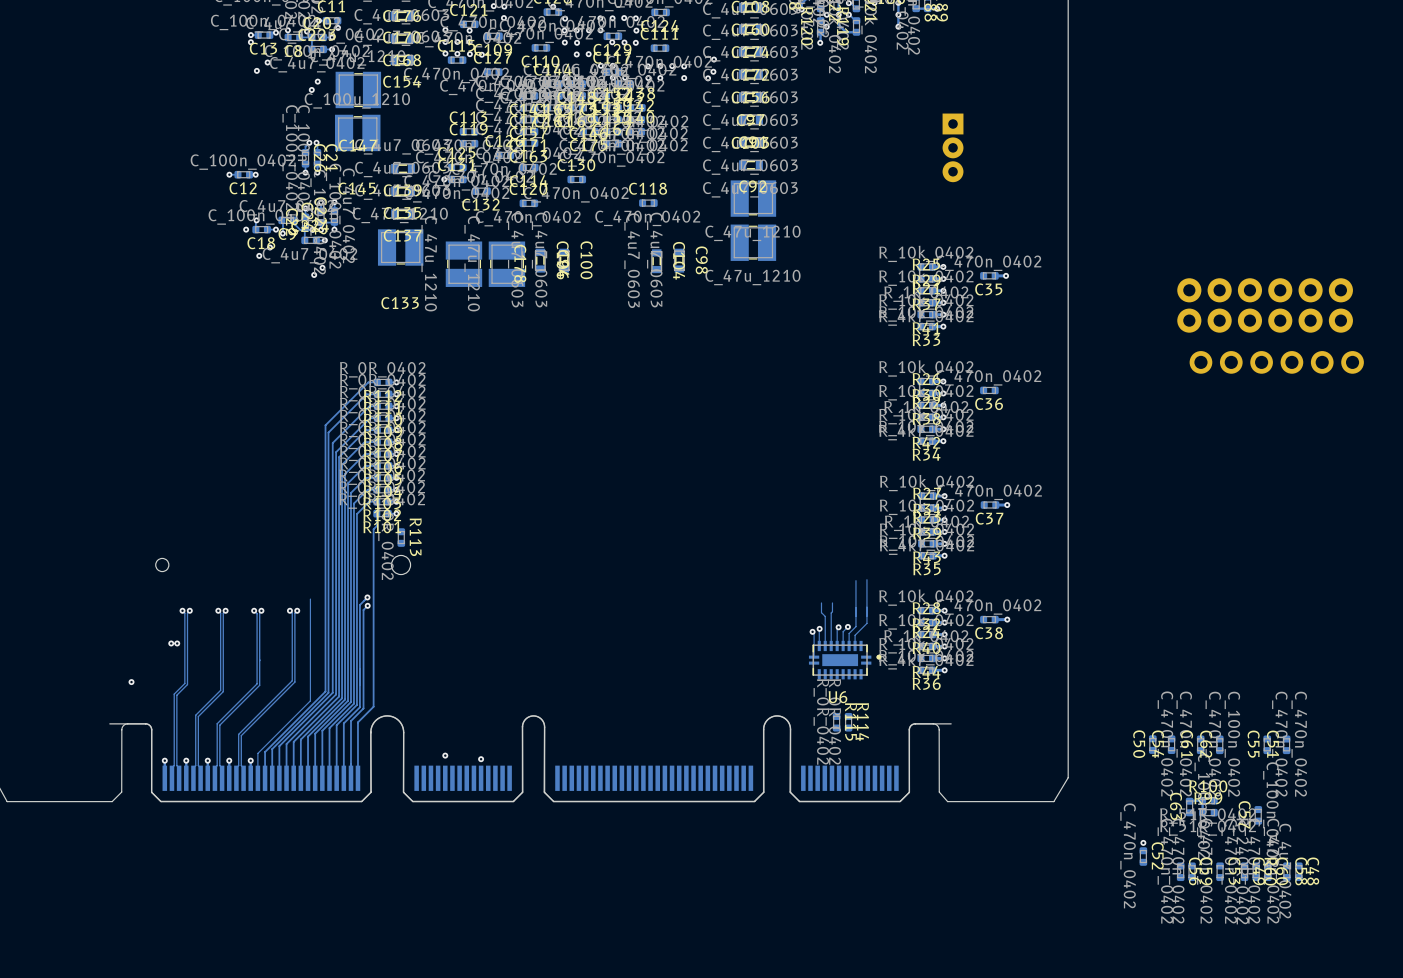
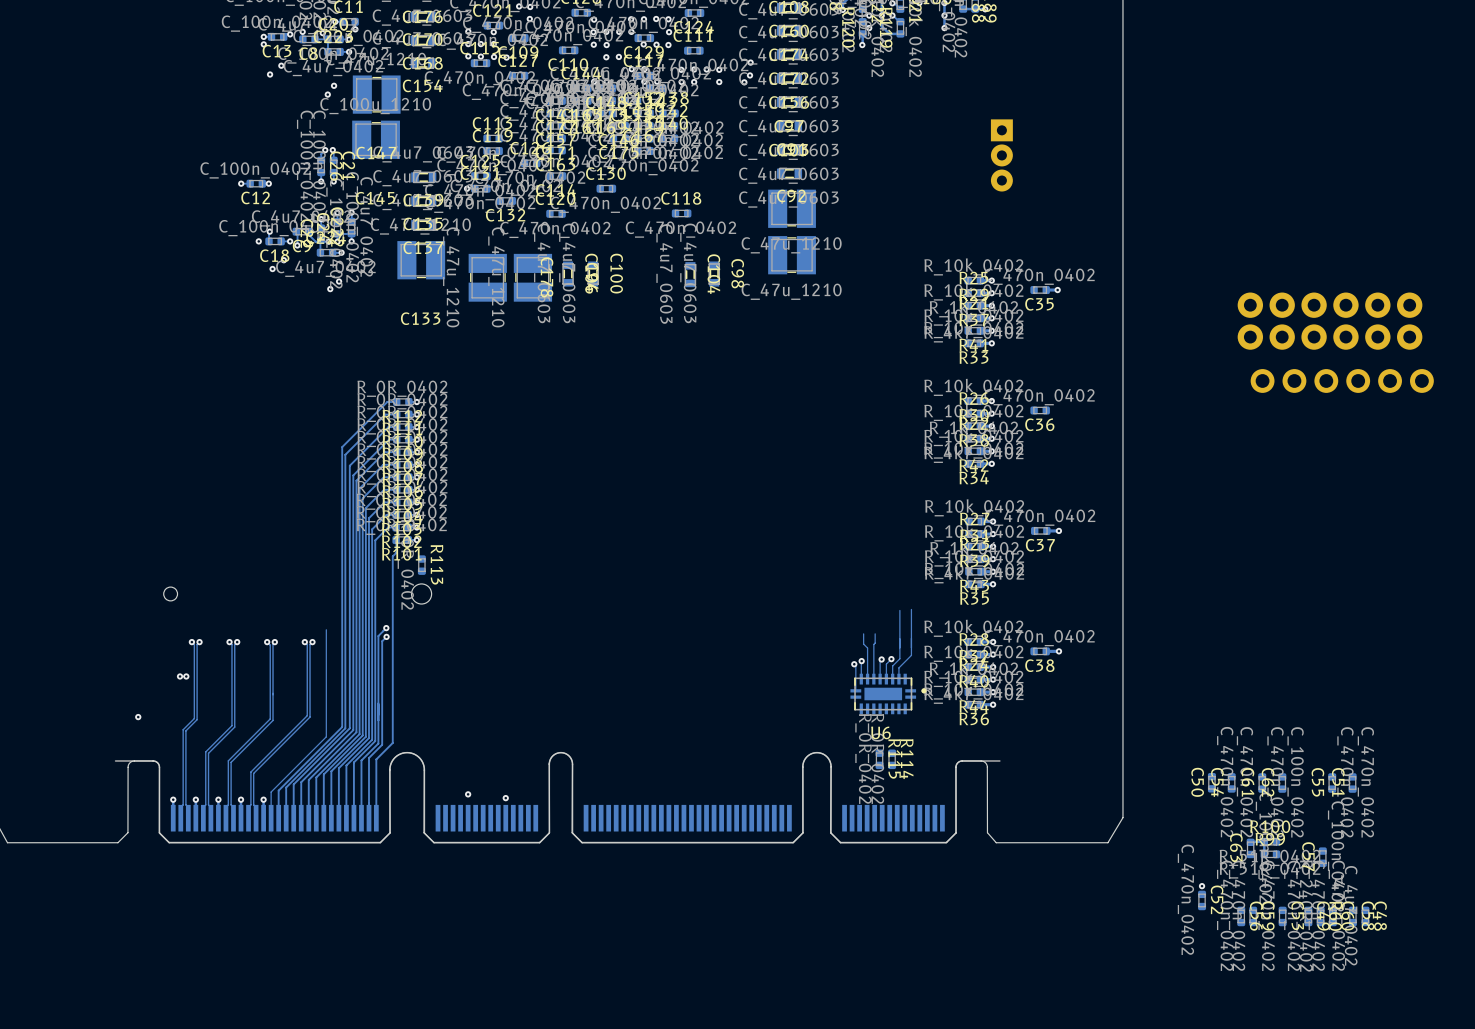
via: (553, 6) -> none

